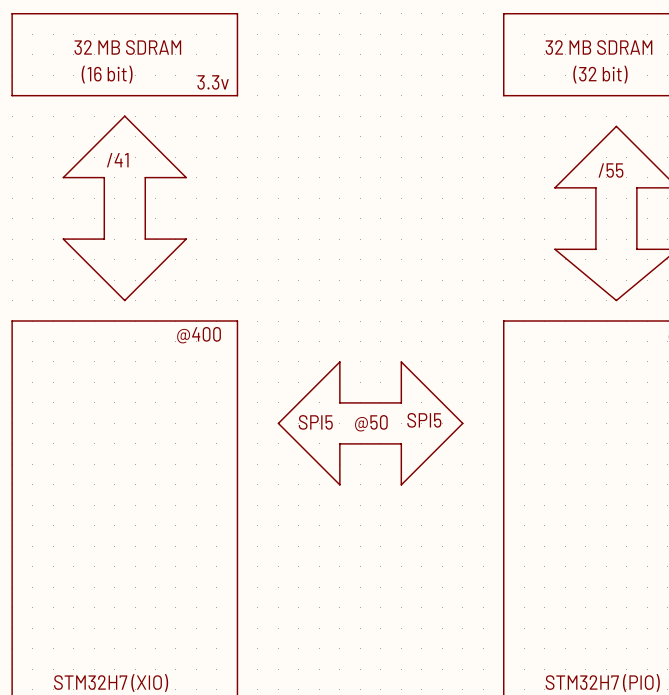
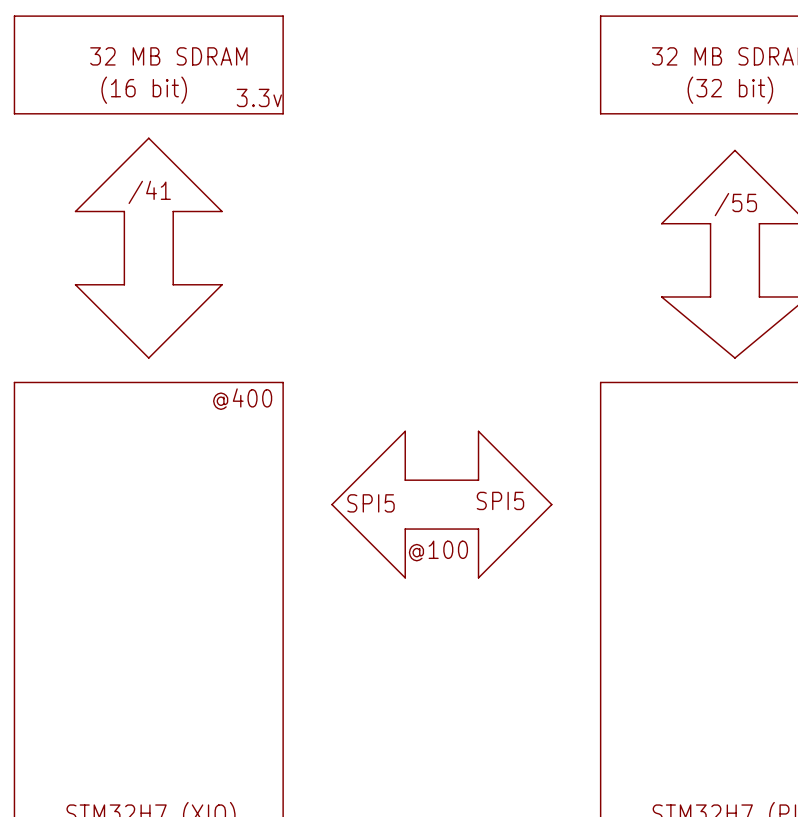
text: @50 (371, 423) -> none
text: none -> @100 (438, 551)

